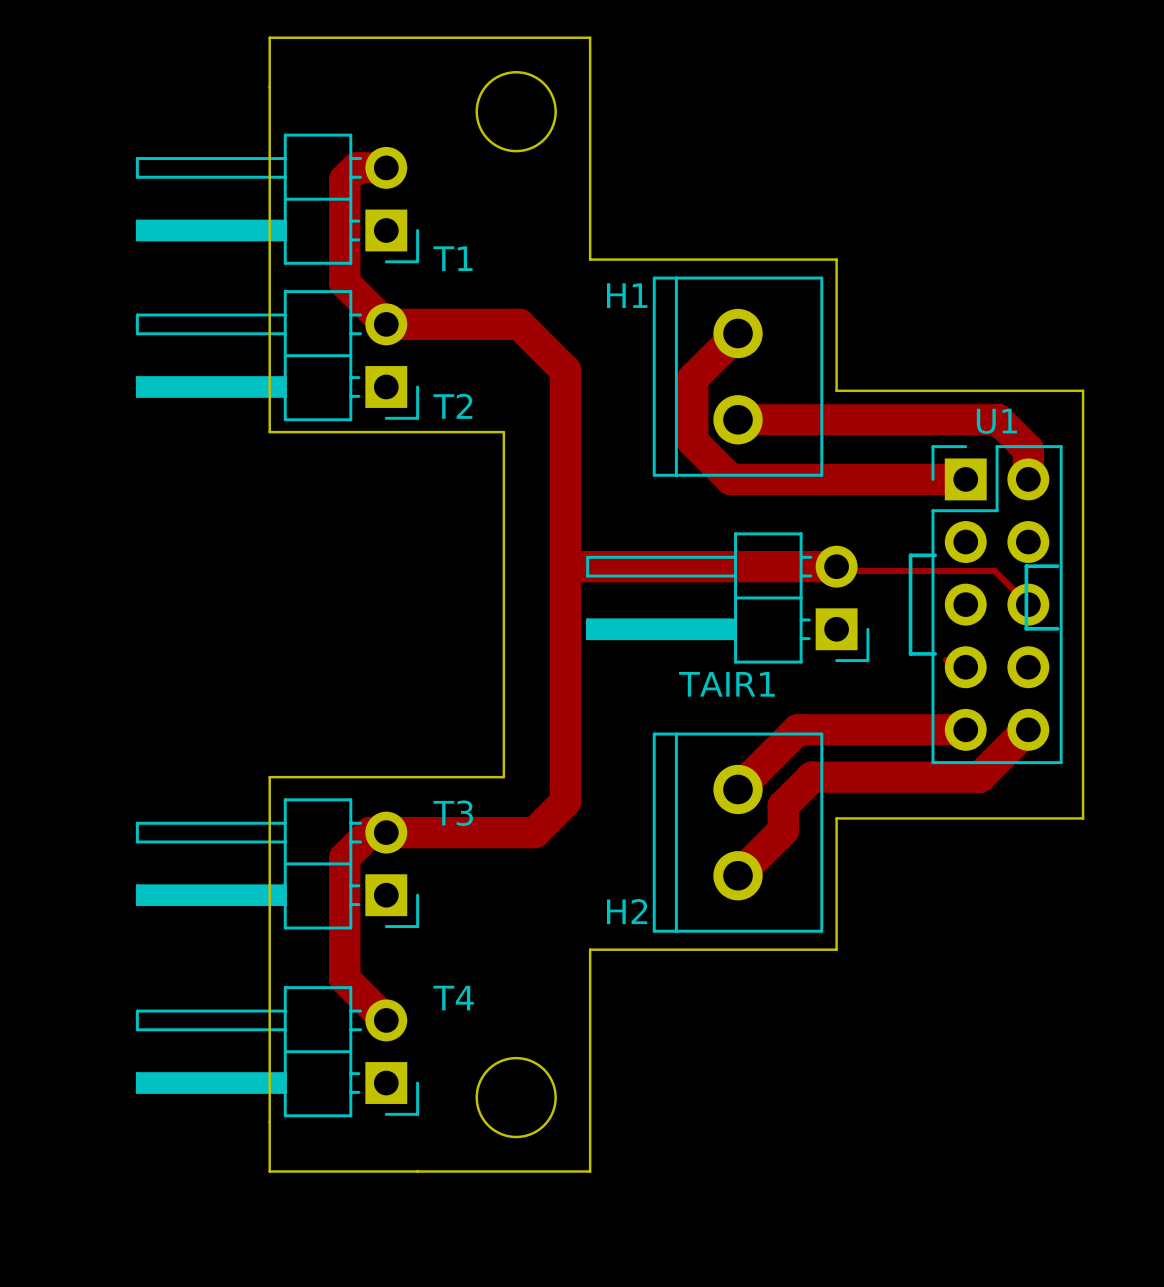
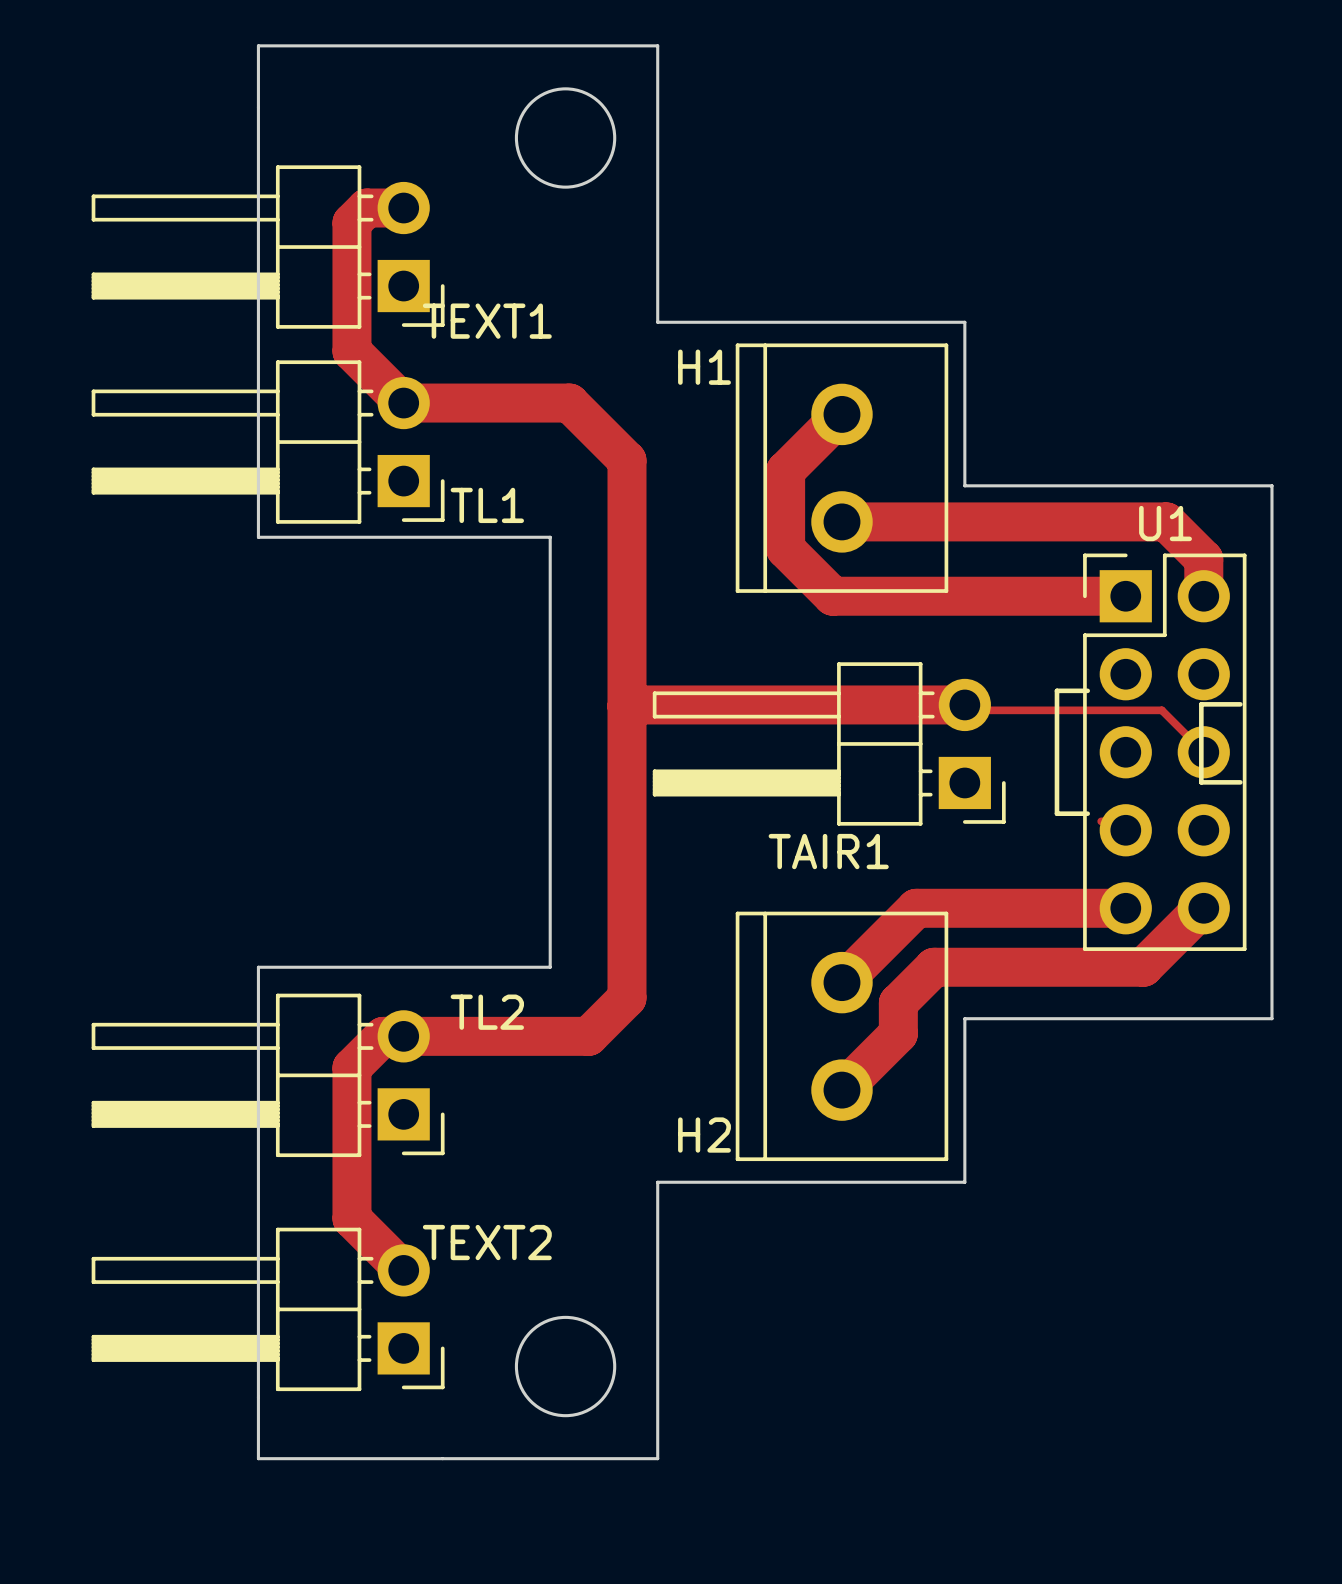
T1 name: T1 (452, 258) -> TEXT1 (487, 321)
T2 name: T2 (452, 406) -> TL1 (487, 505)
T3 name: T3 (453, 813) -> TL2 (487, 1012)
T4 name: T4 (453, 998) -> TEXT2 (487, 1242)

